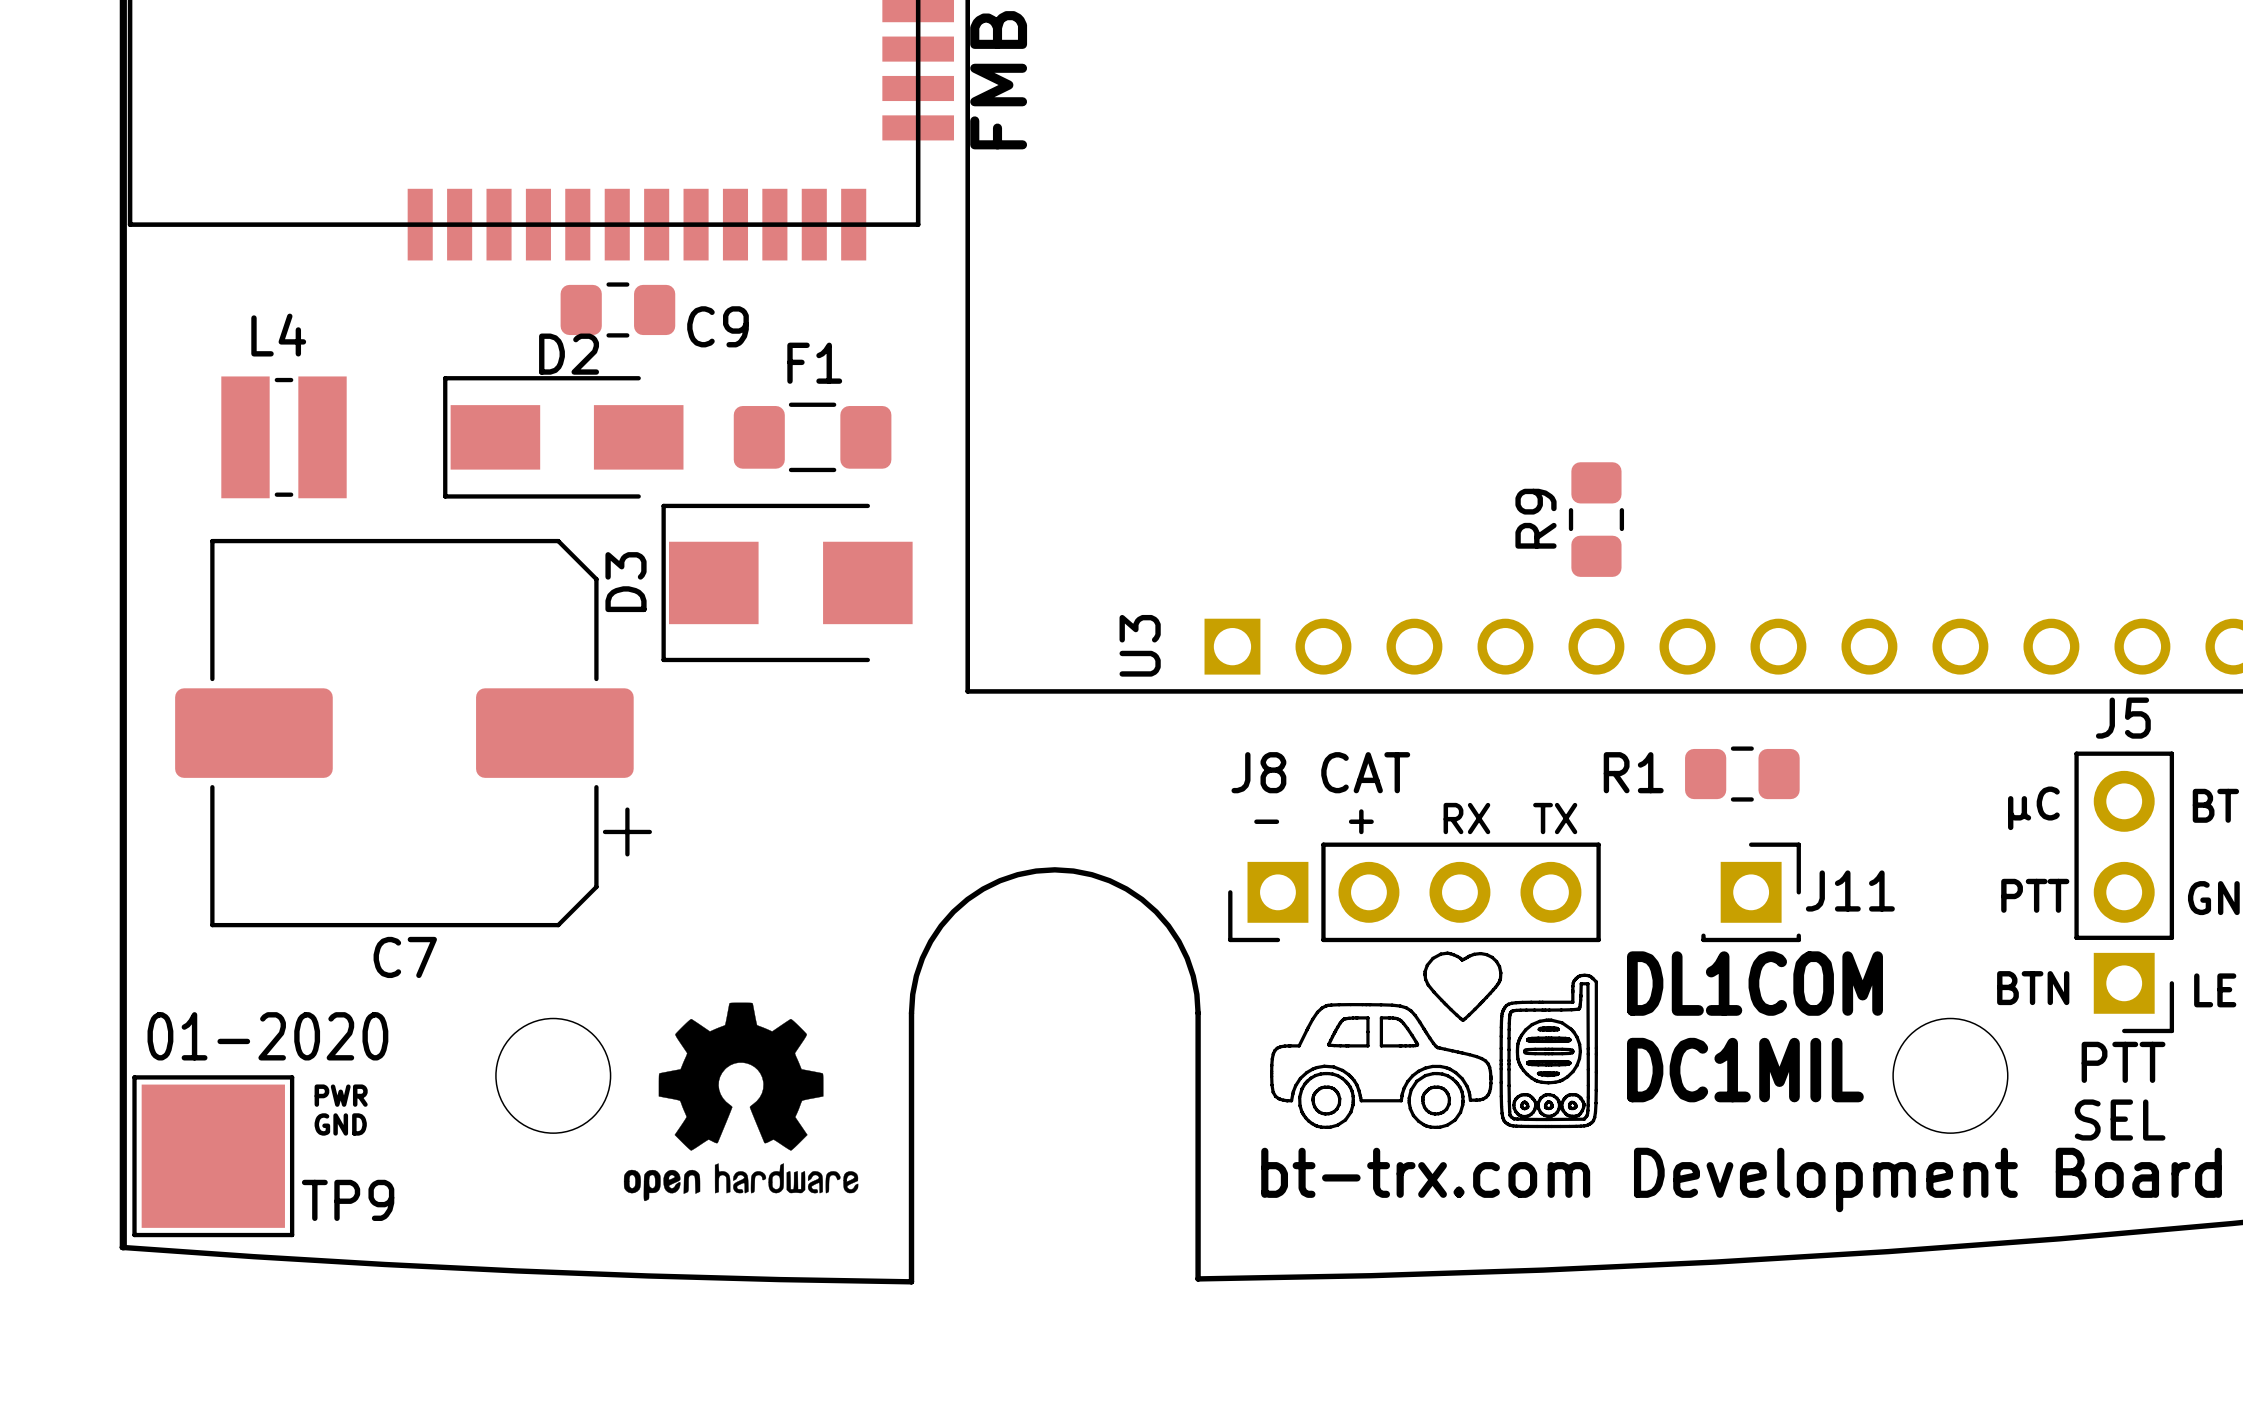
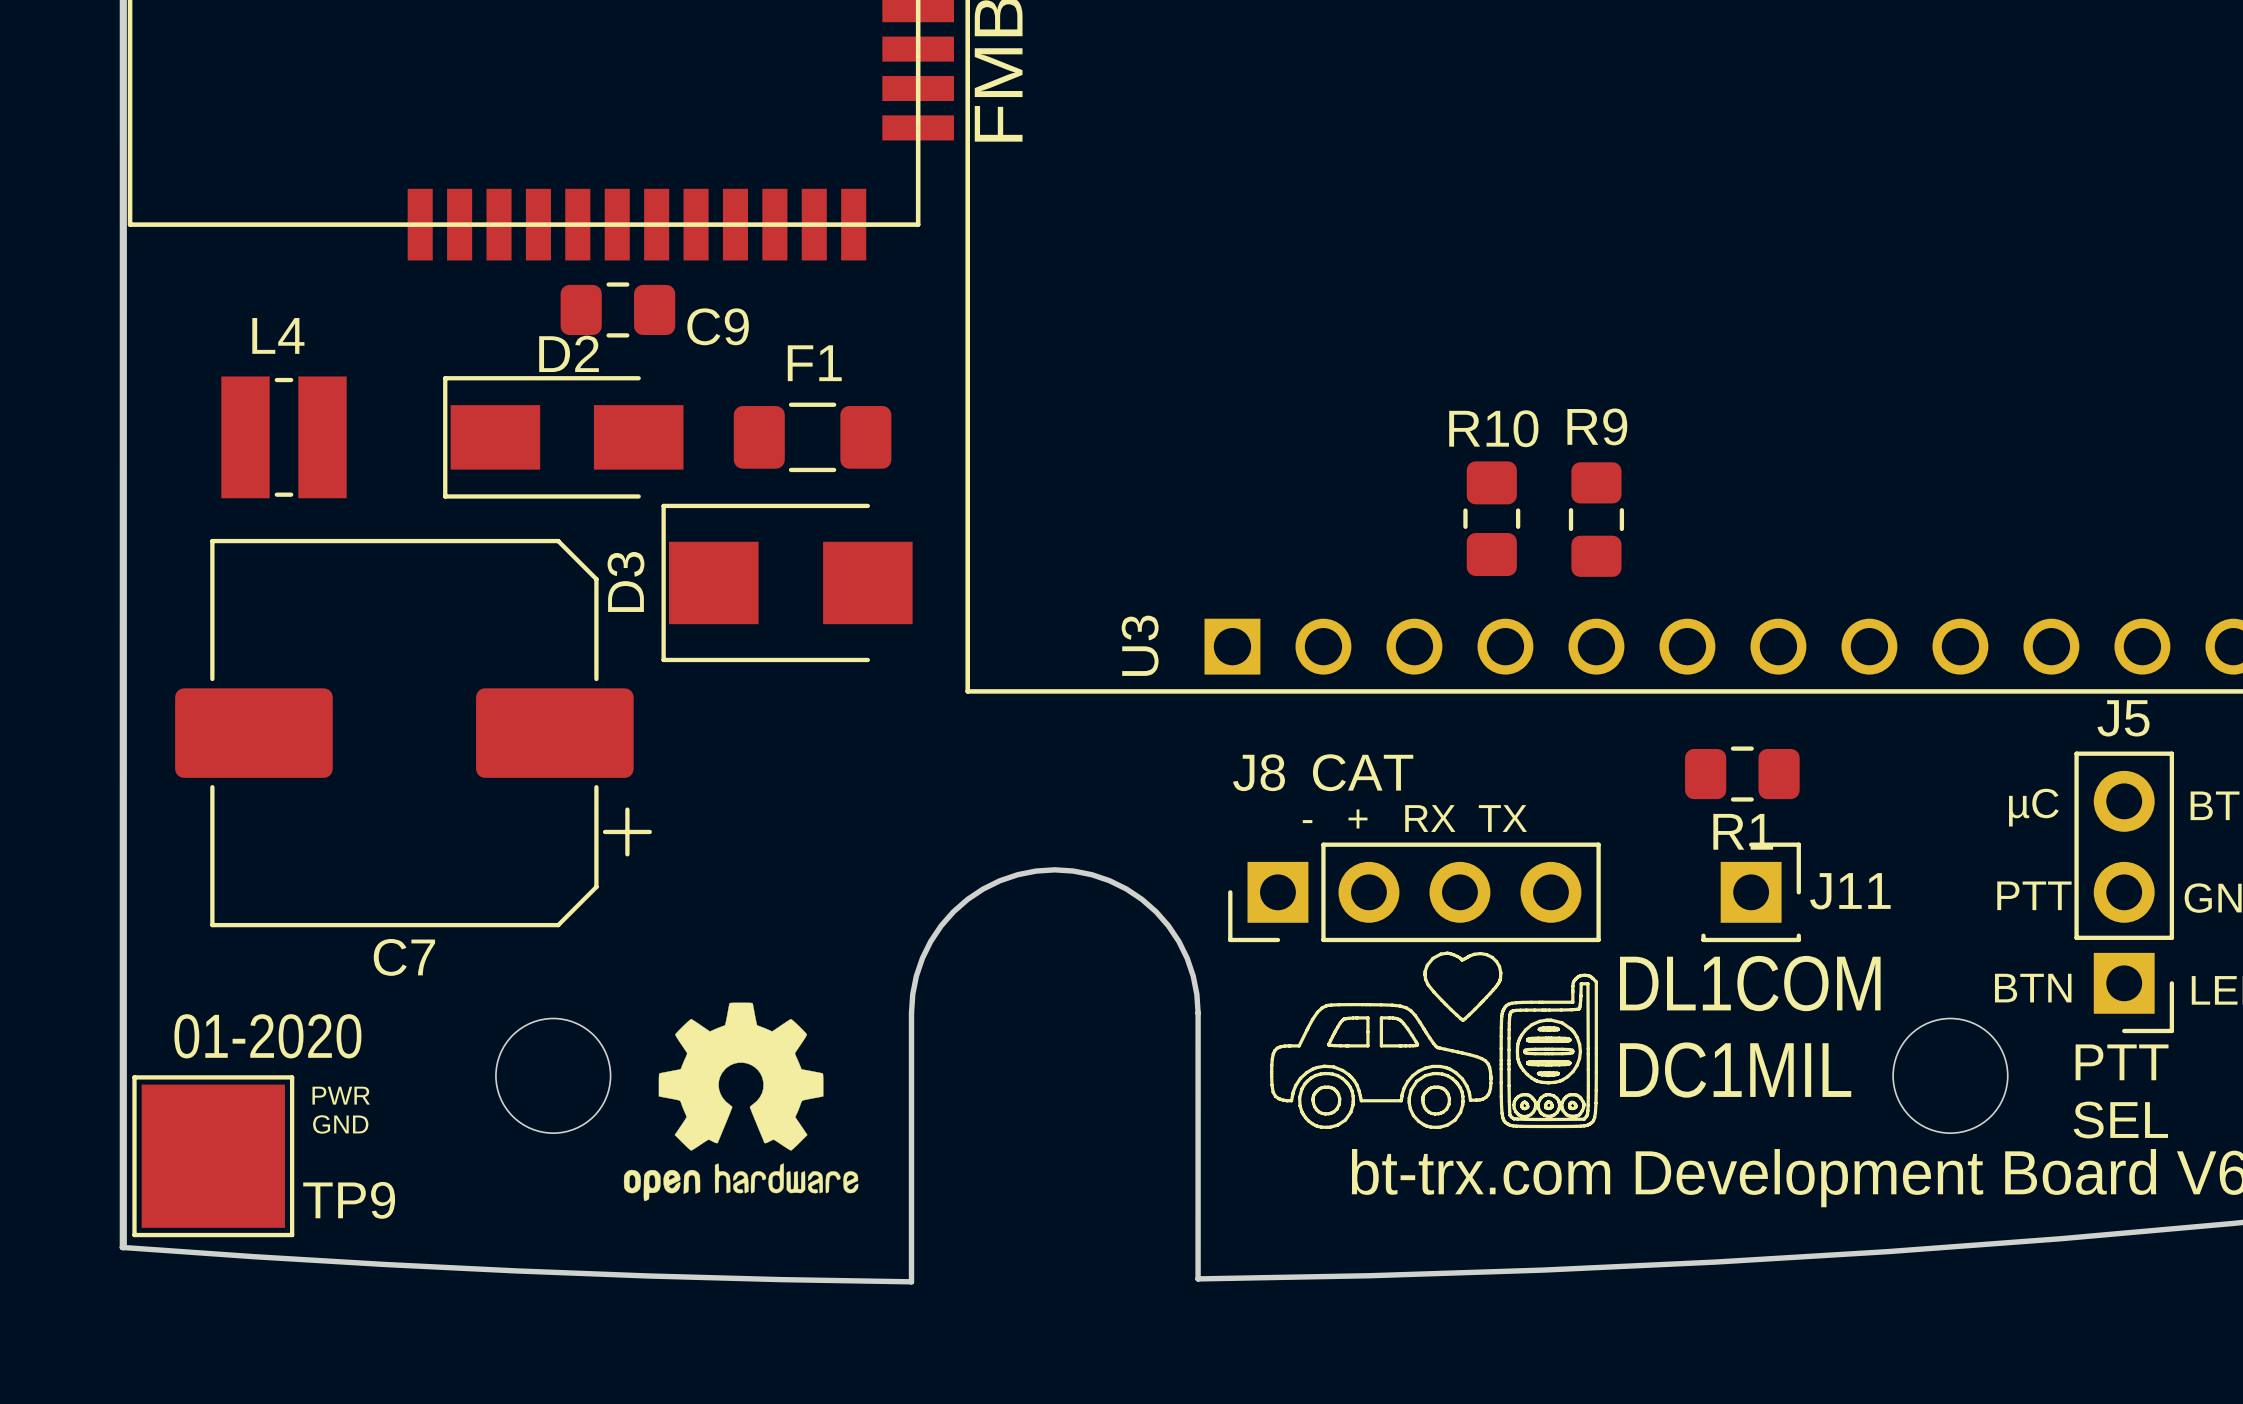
R10: none -> (1491, 518)
R9 name rotation: 0° (1535, 518) -> 90° clockwise (1597, 426)
R9 name position: R9 (1535, 518) -> R9 (1597, 426)
R1 name position: R1 (1633, 772) -> R1 (1743, 831)

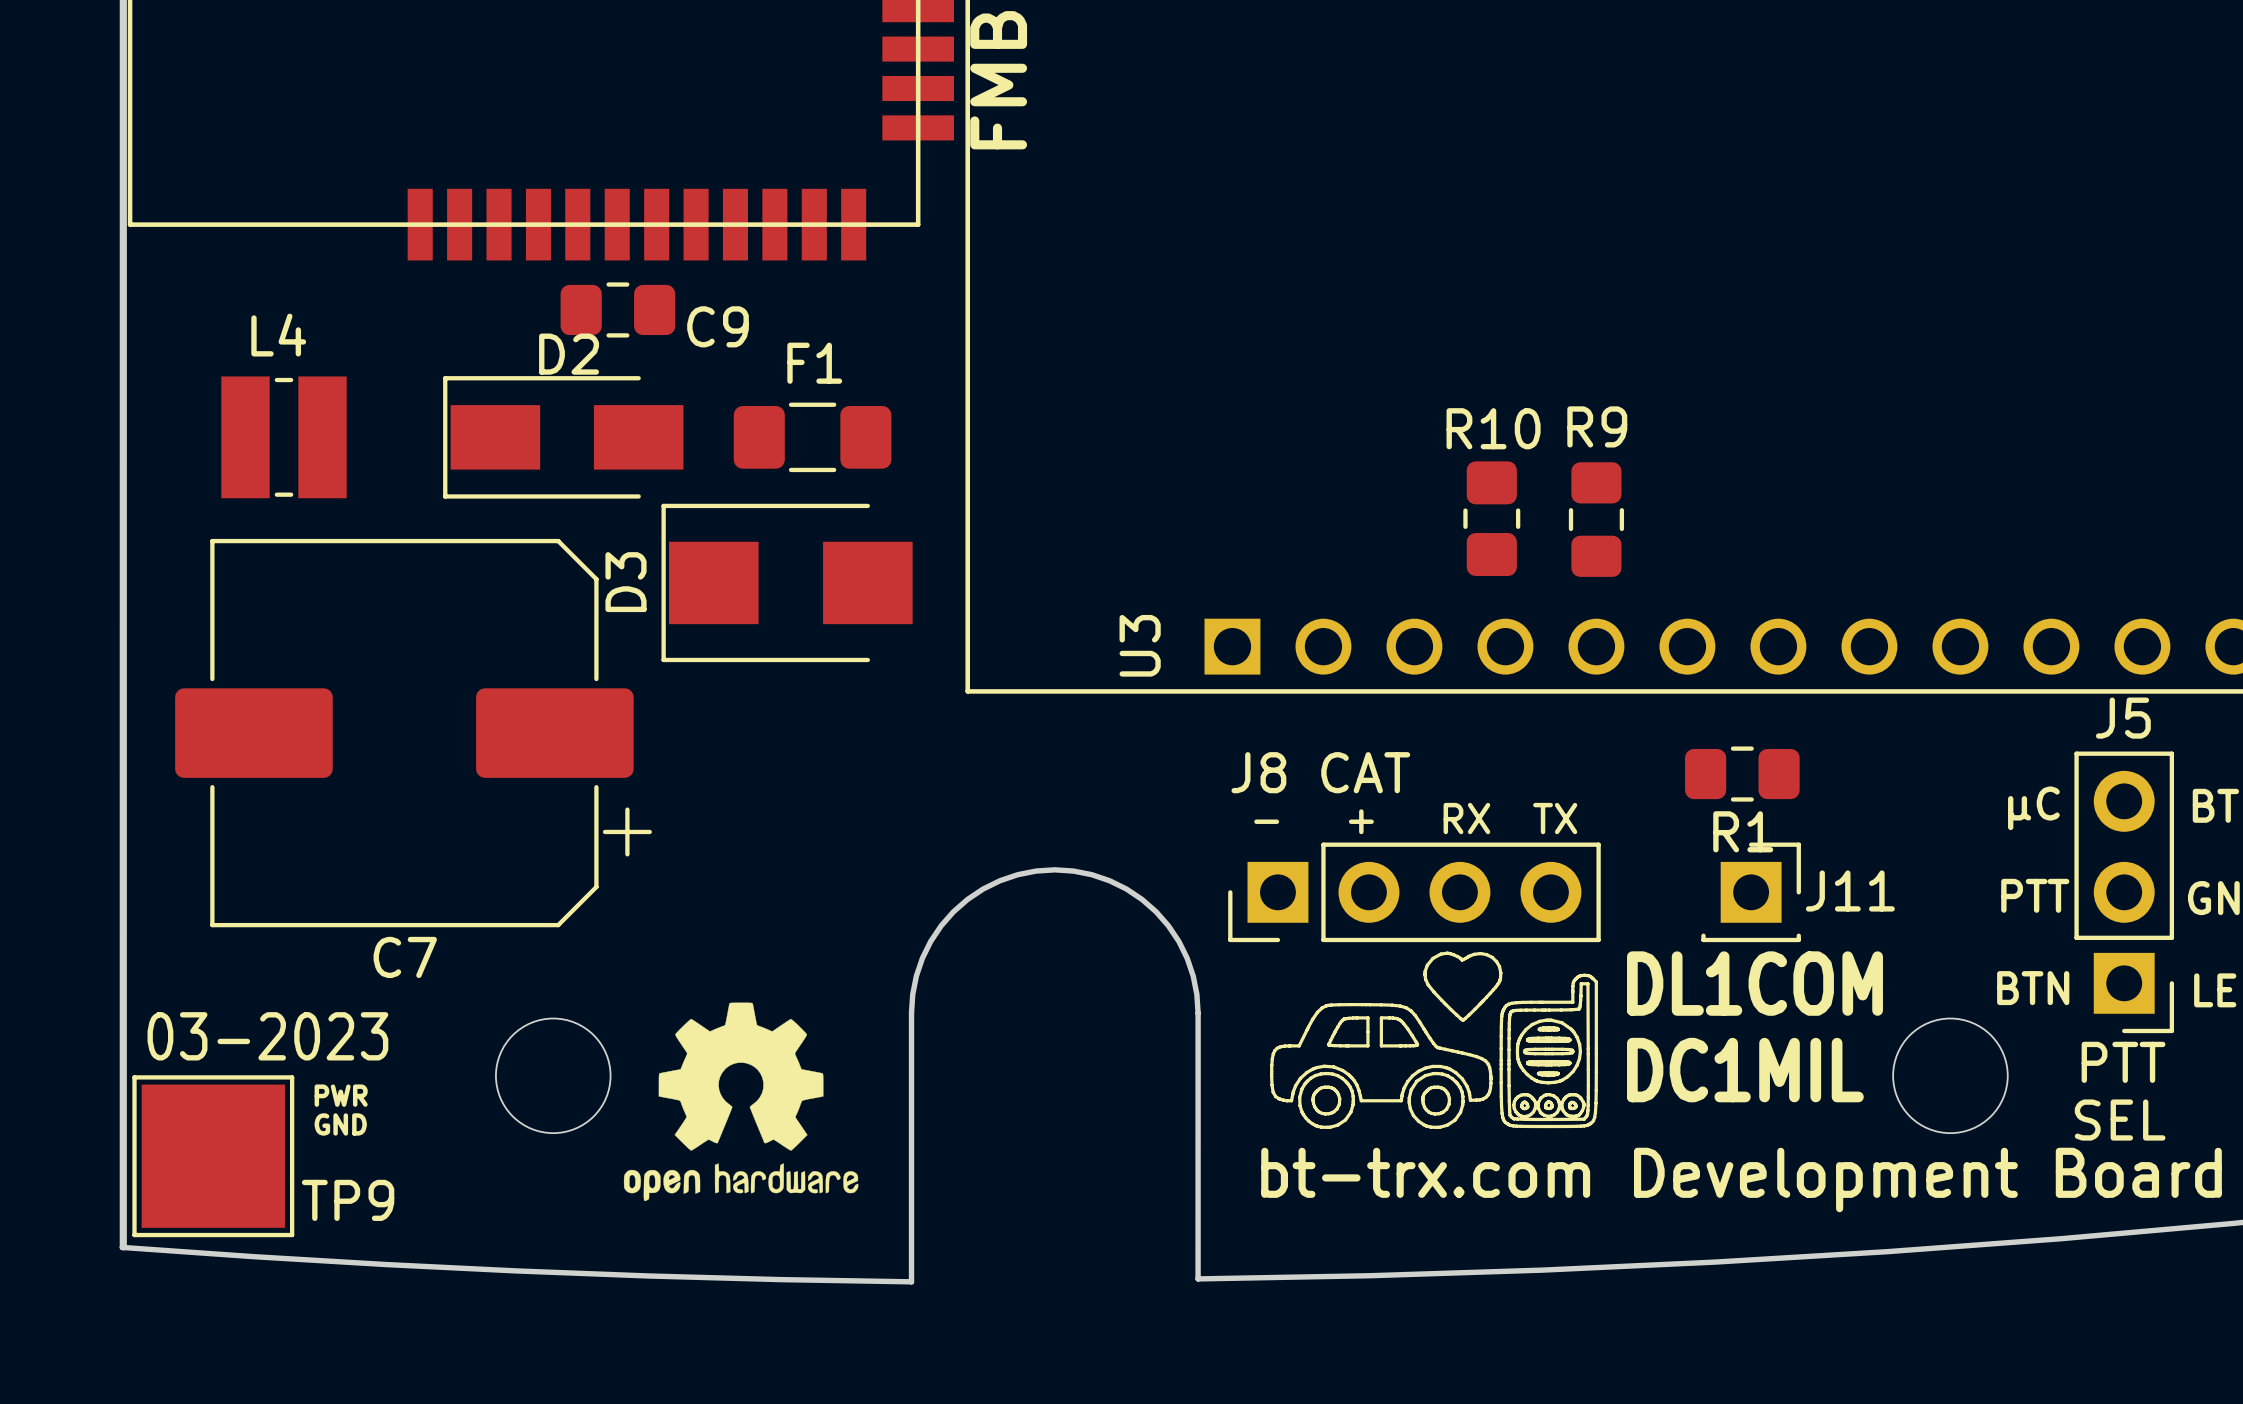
text: 01-2020 (267, 1036) -> 03-2023 (267, 1036)

